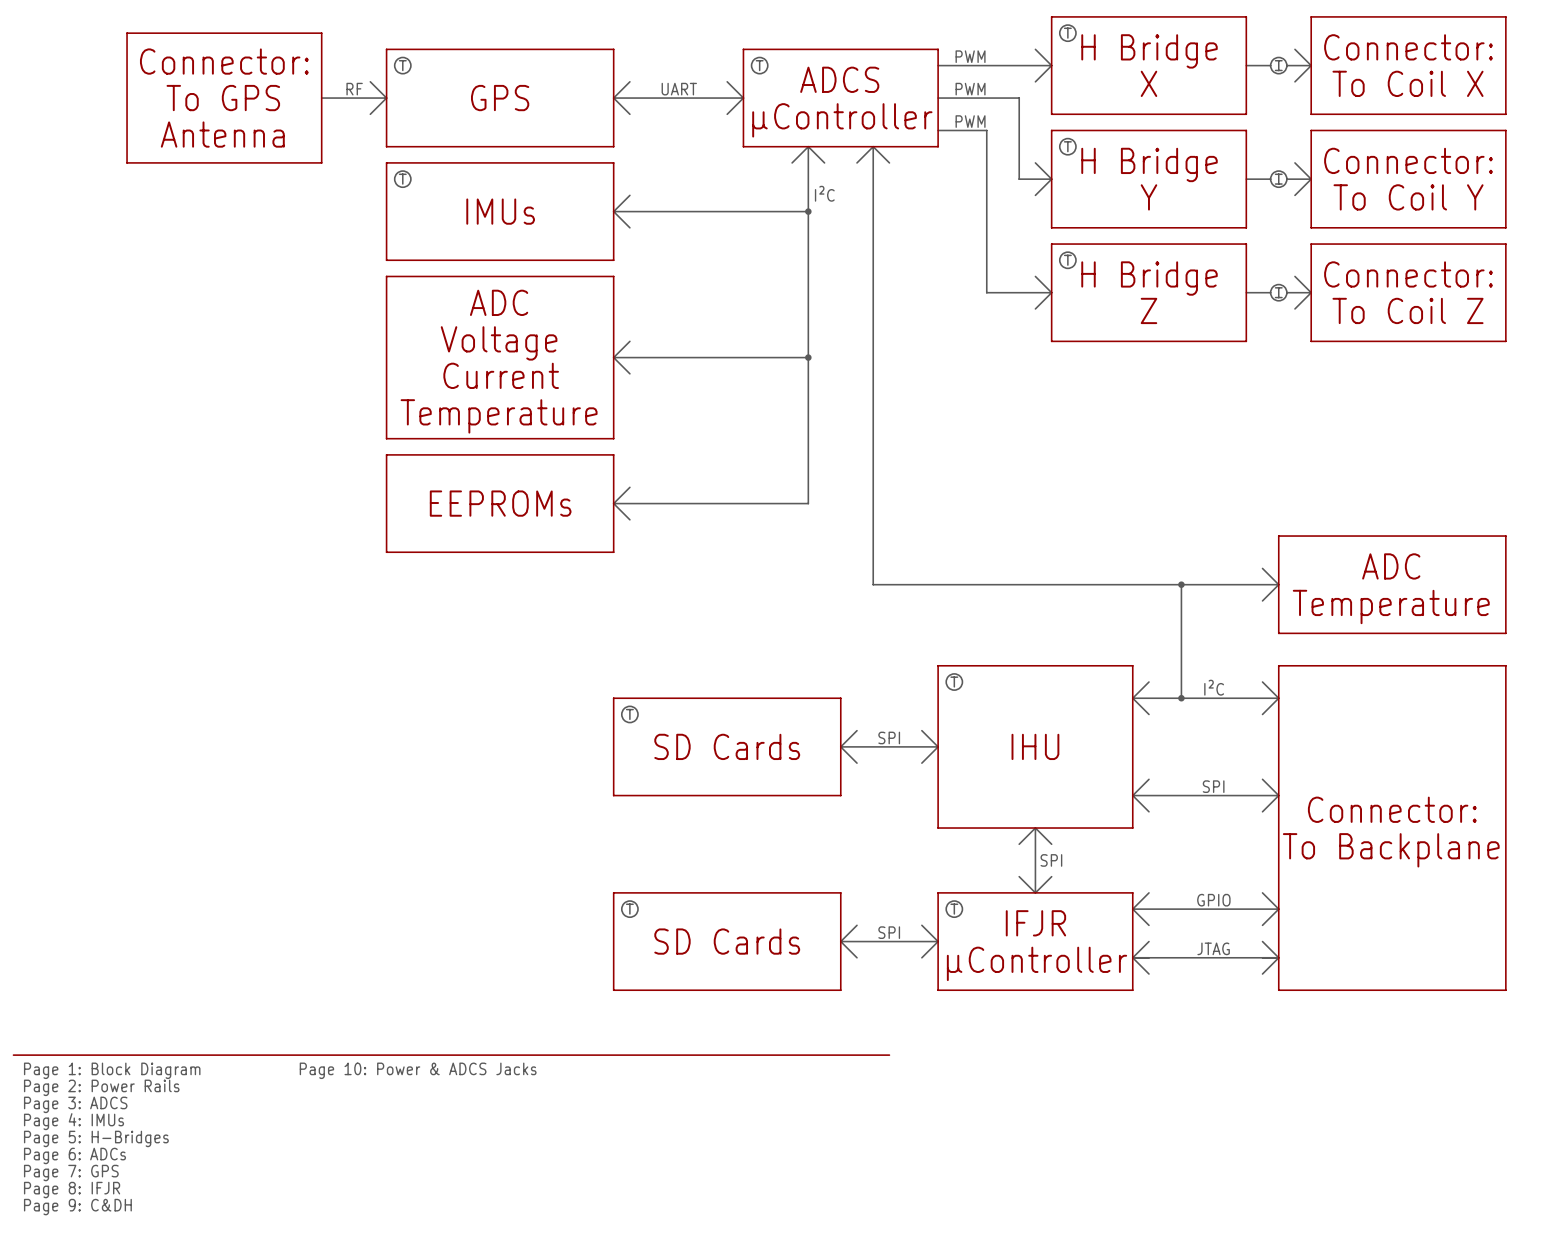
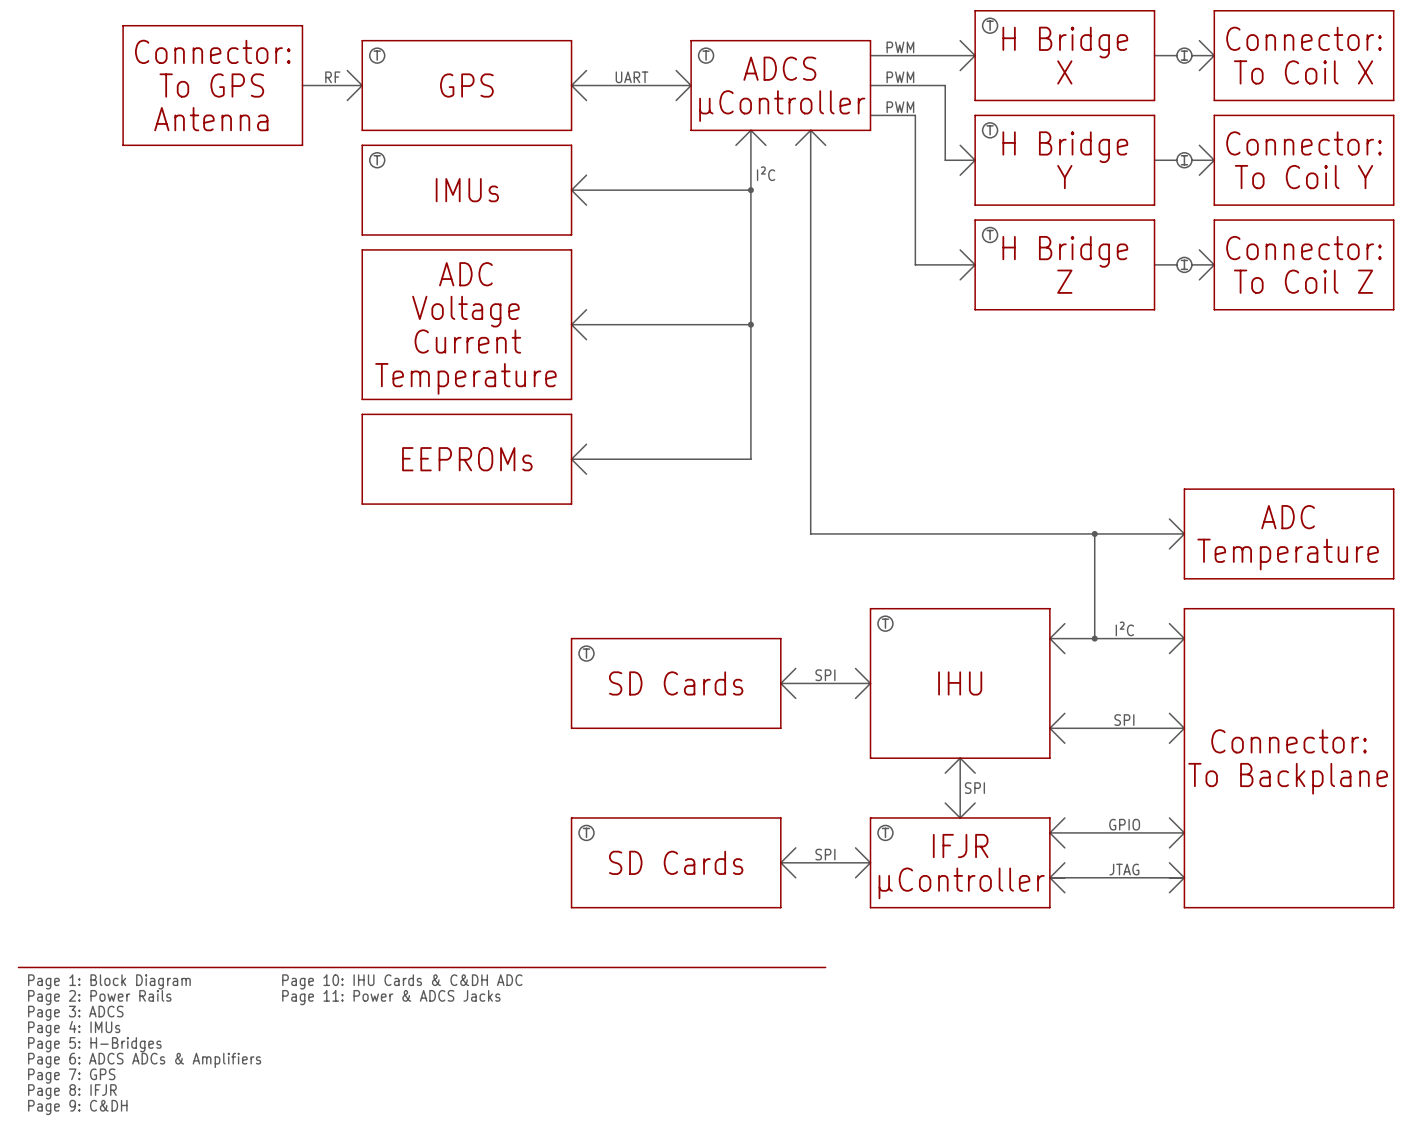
text: Page 10: Power & ADCS Jacks (418, 1070) -> Page 10: IHU Cards & C&DH ADC (402, 981)
text: none -> Page 11: Power & ADCS Jacks (391, 997)
text: Page 6: ADCs (74, 1155) -> Page 6: ADCS ADCs & Amplifiers (144, 1060)

